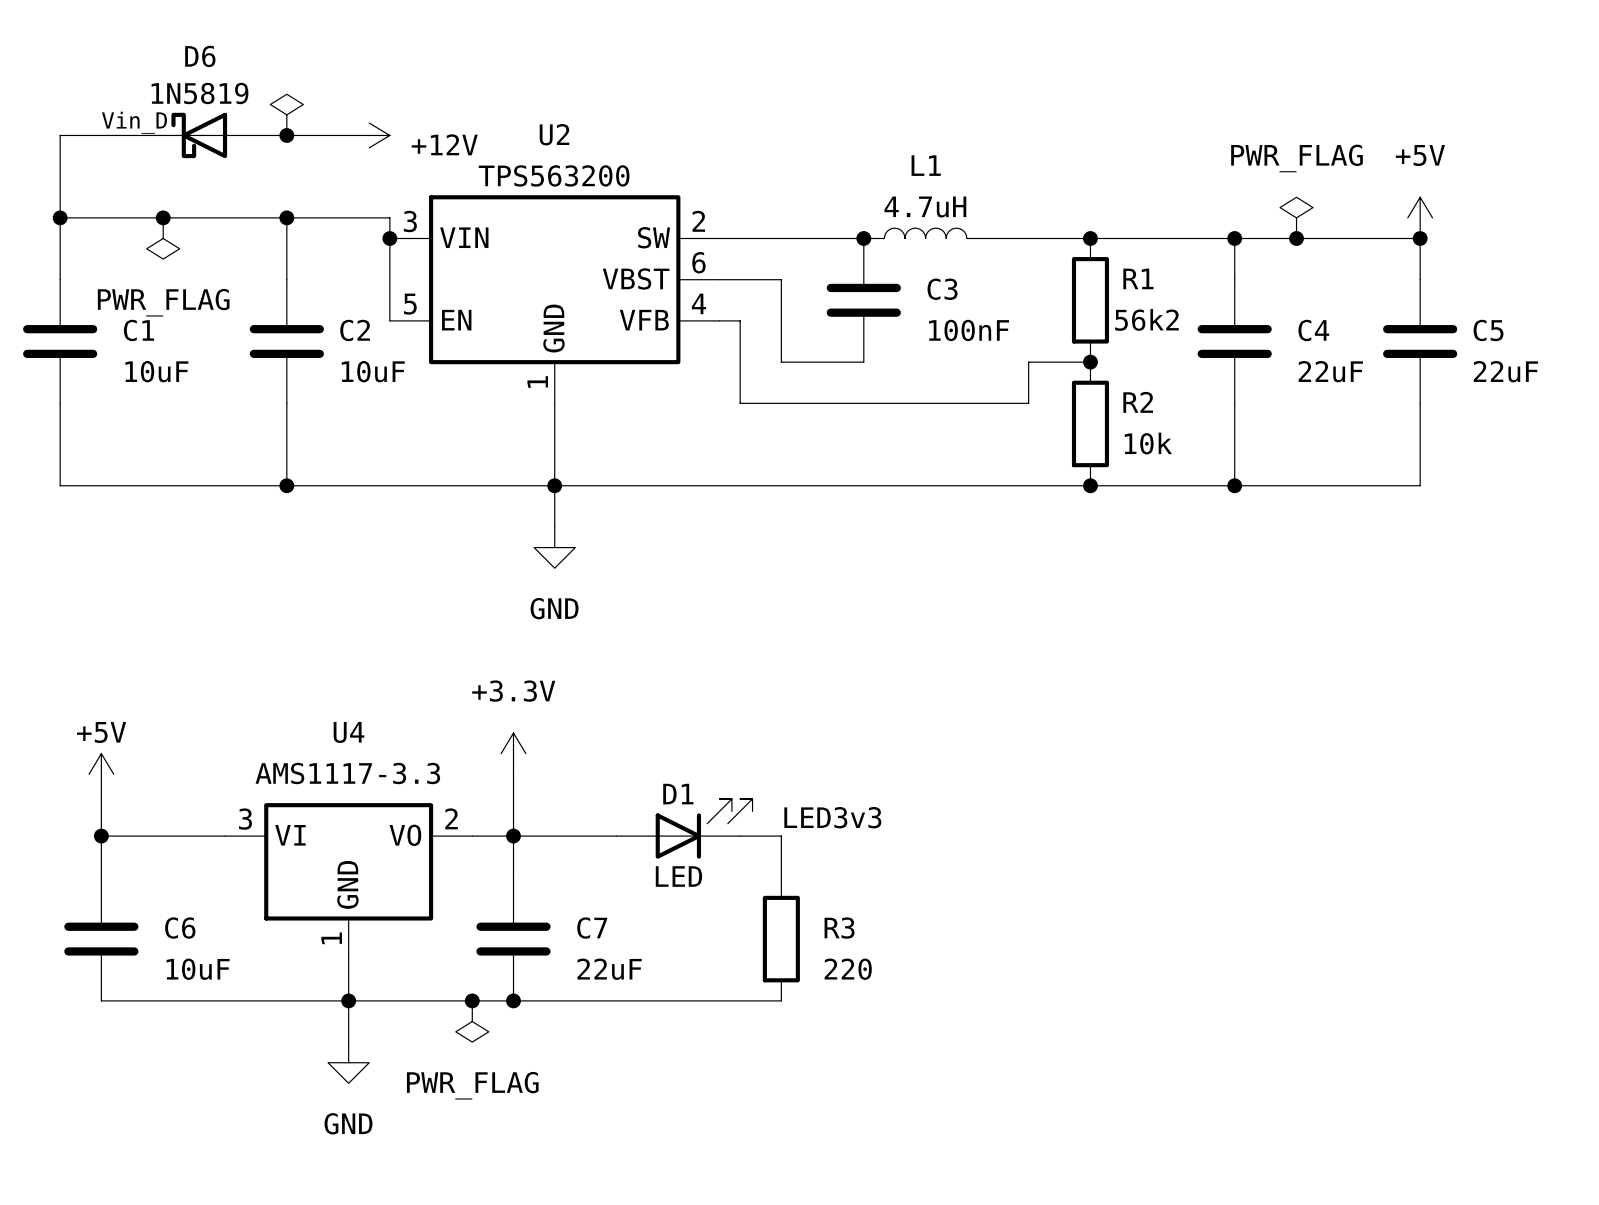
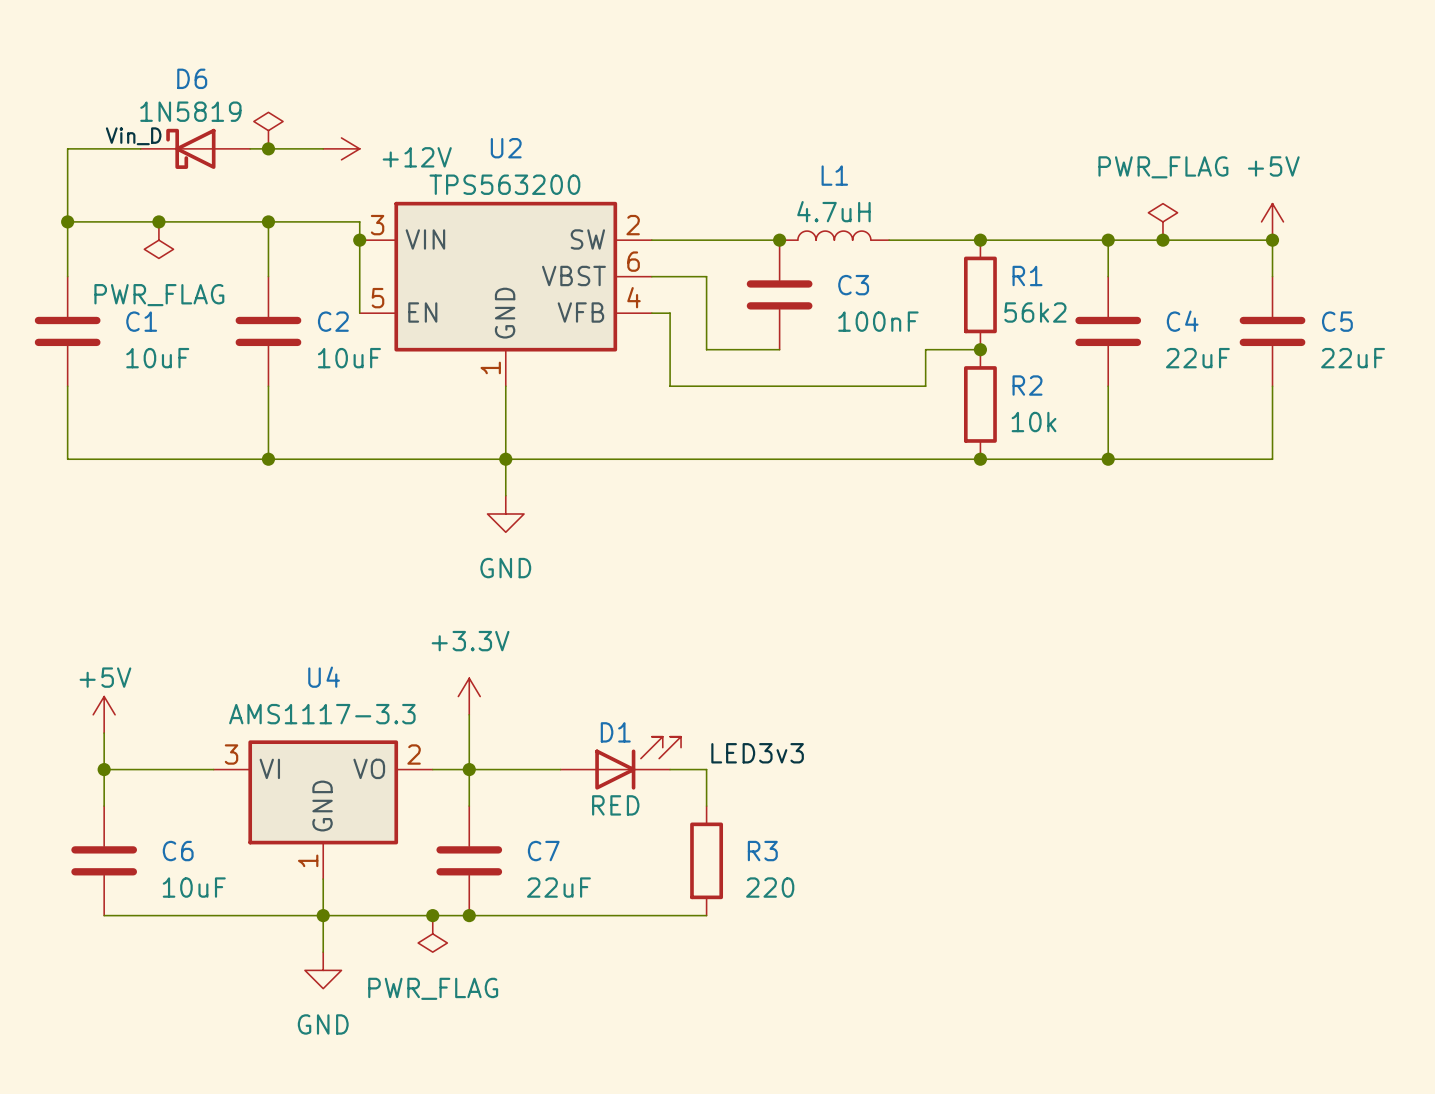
D1 value: LED (678, 876) -> RED (615, 805)

